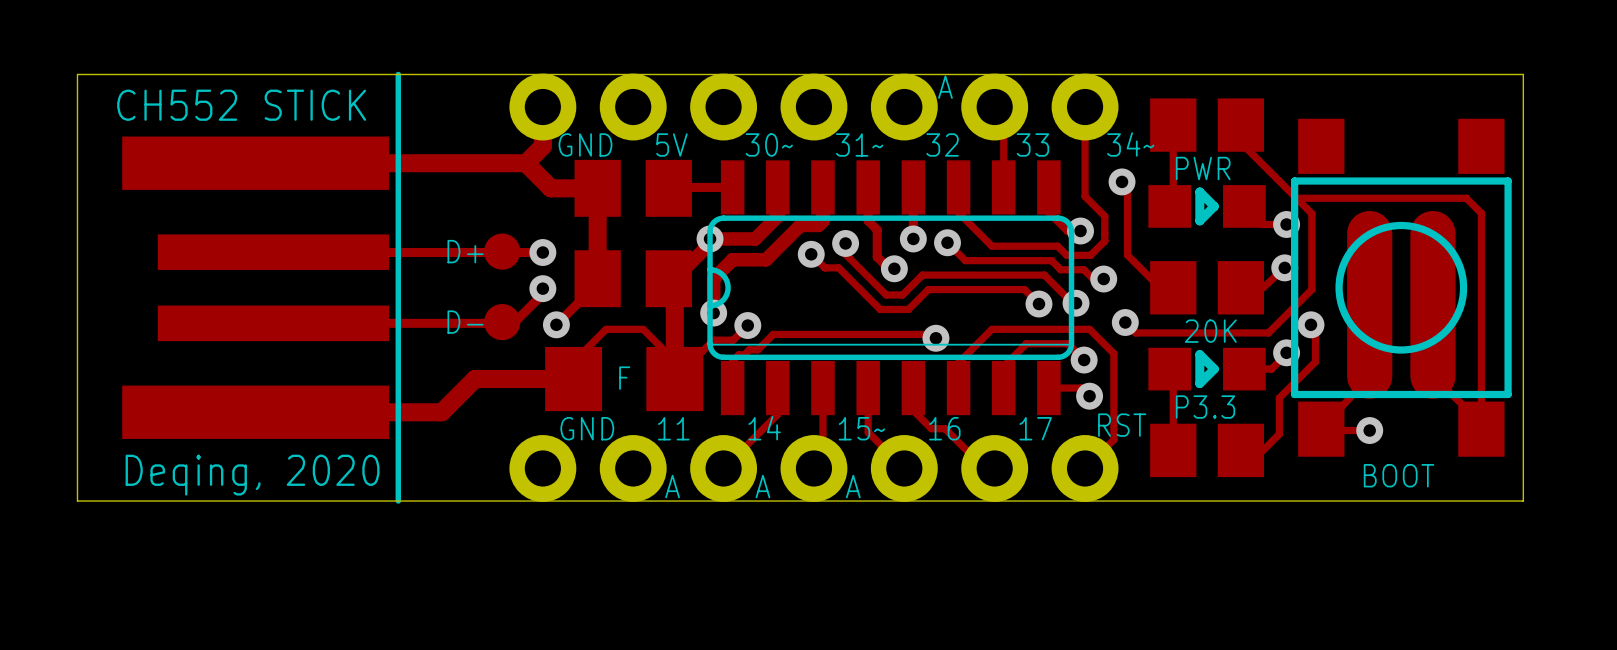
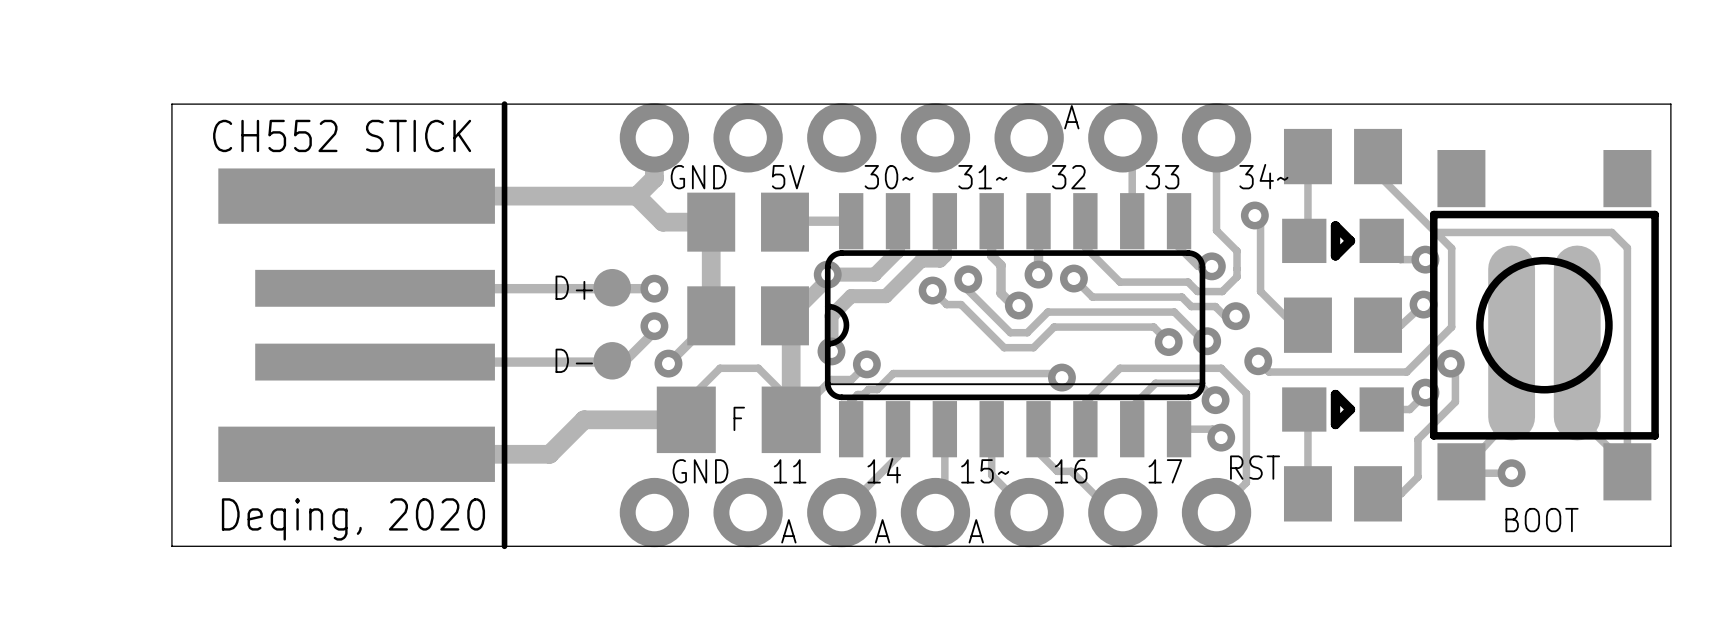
text: PWR (1203, 168) -> none
text: 20K (1210, 331) -> none
text: P3.3 (1205, 407) -> none

